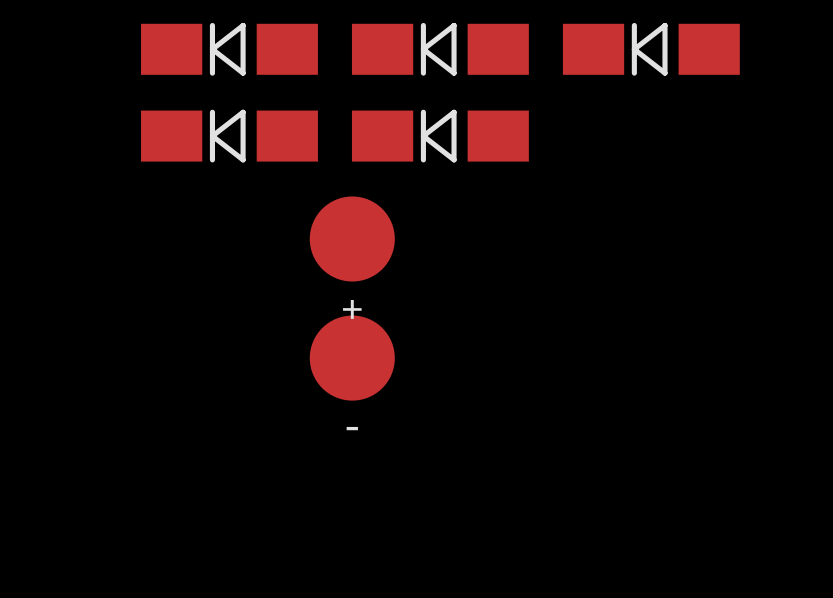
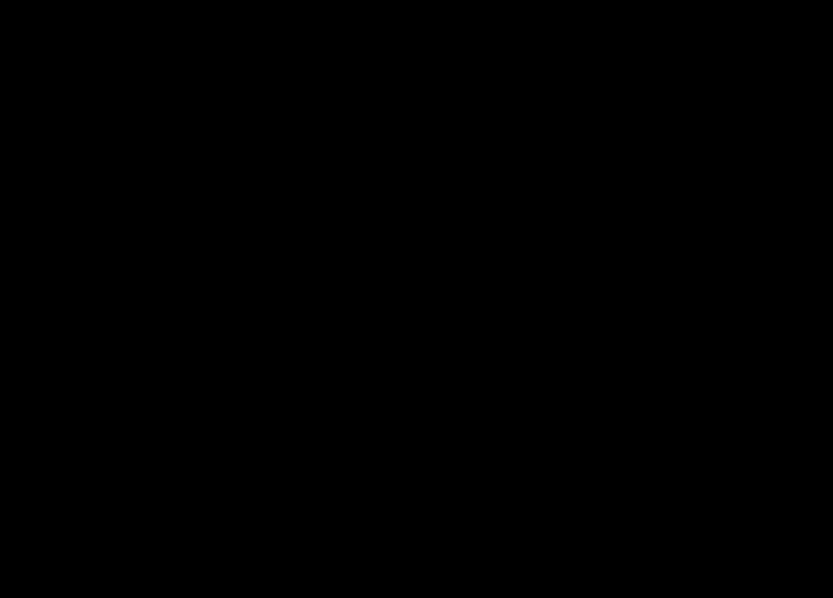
part: (229, 49) -> none
part: (440, 49) -> none
part: (651, 49) -> none
part: (229, 136) -> none
part: (440, 136) -> none
part: + (352, 239) -> none
part: - (352, 358) -> none

